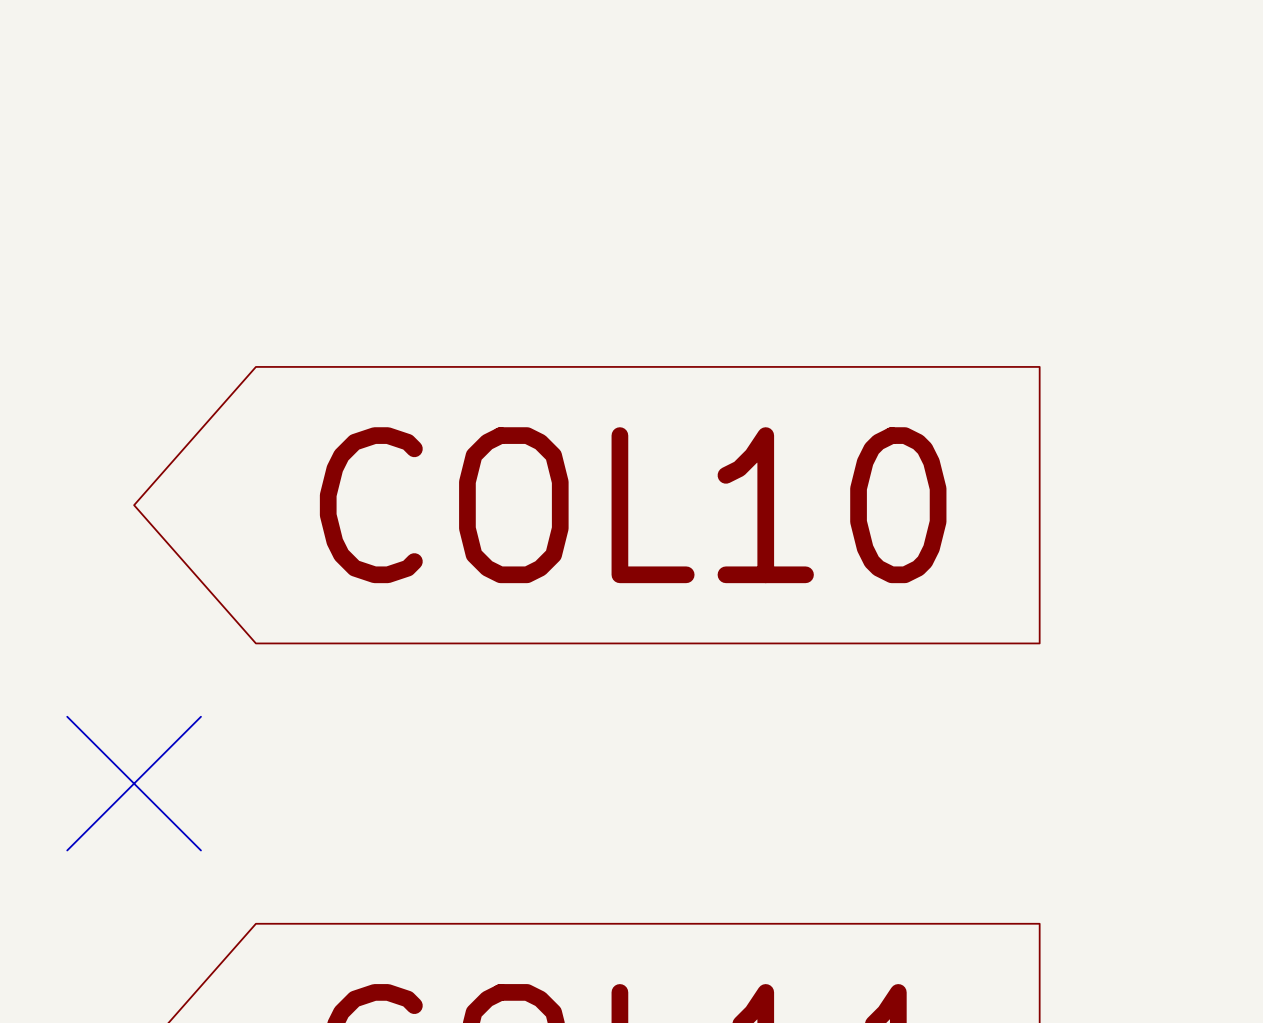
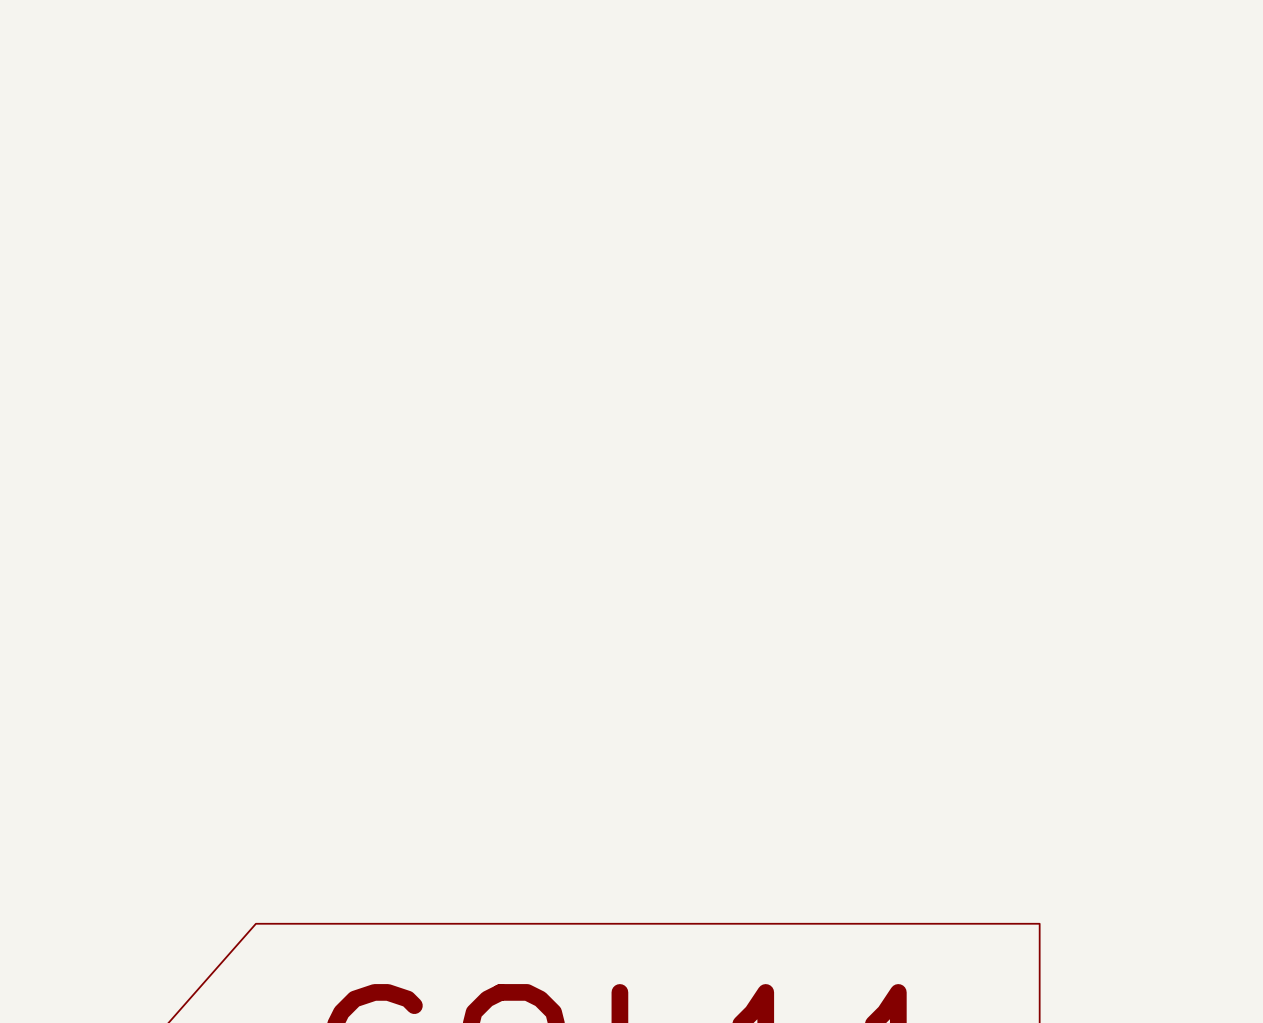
global label: COL10 (633, 505) -> none
no-connect mark: (134, 783) -> none

